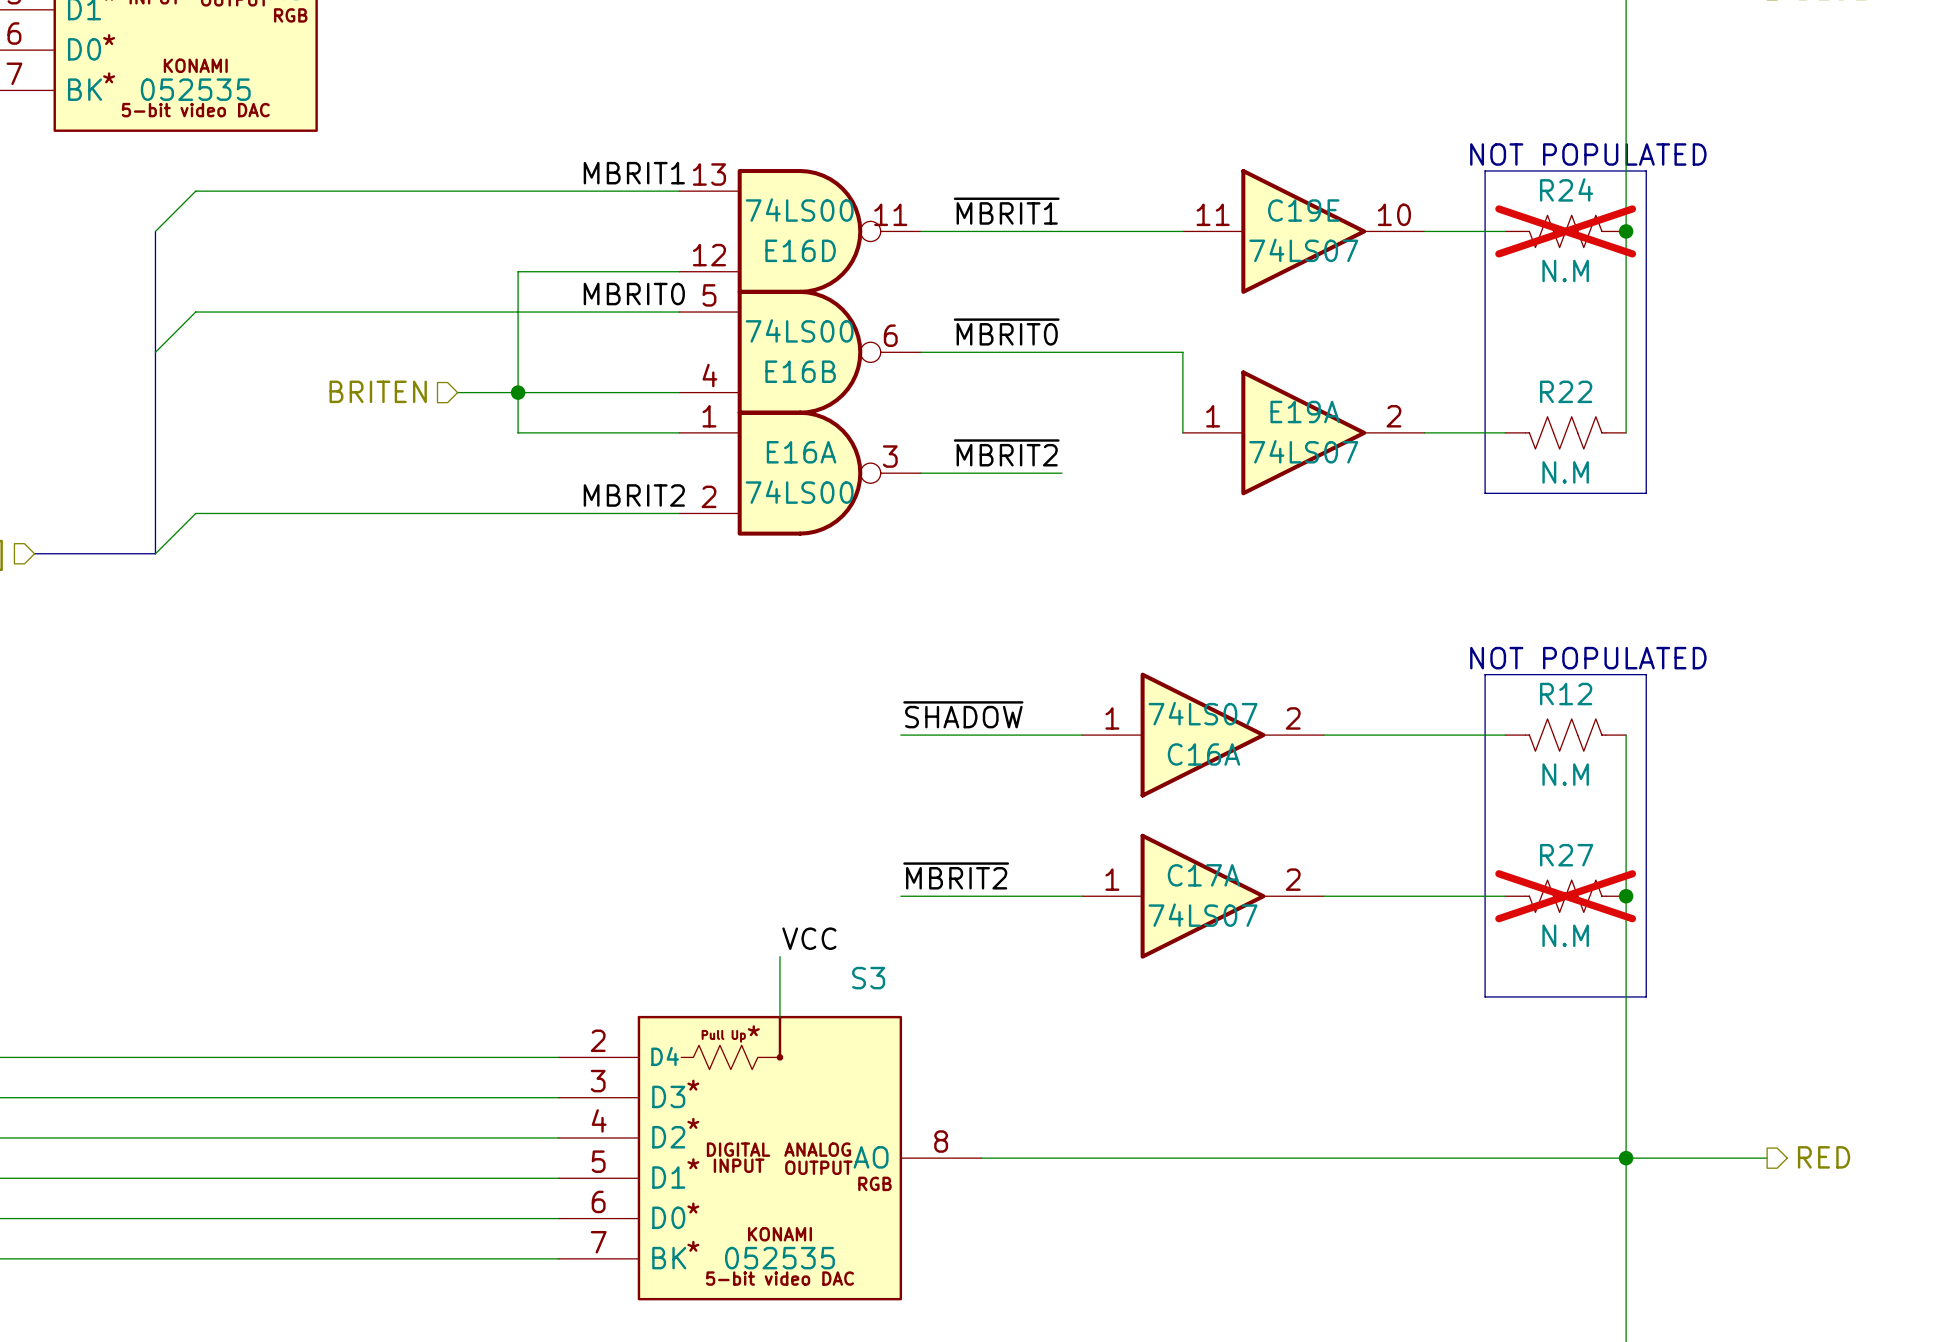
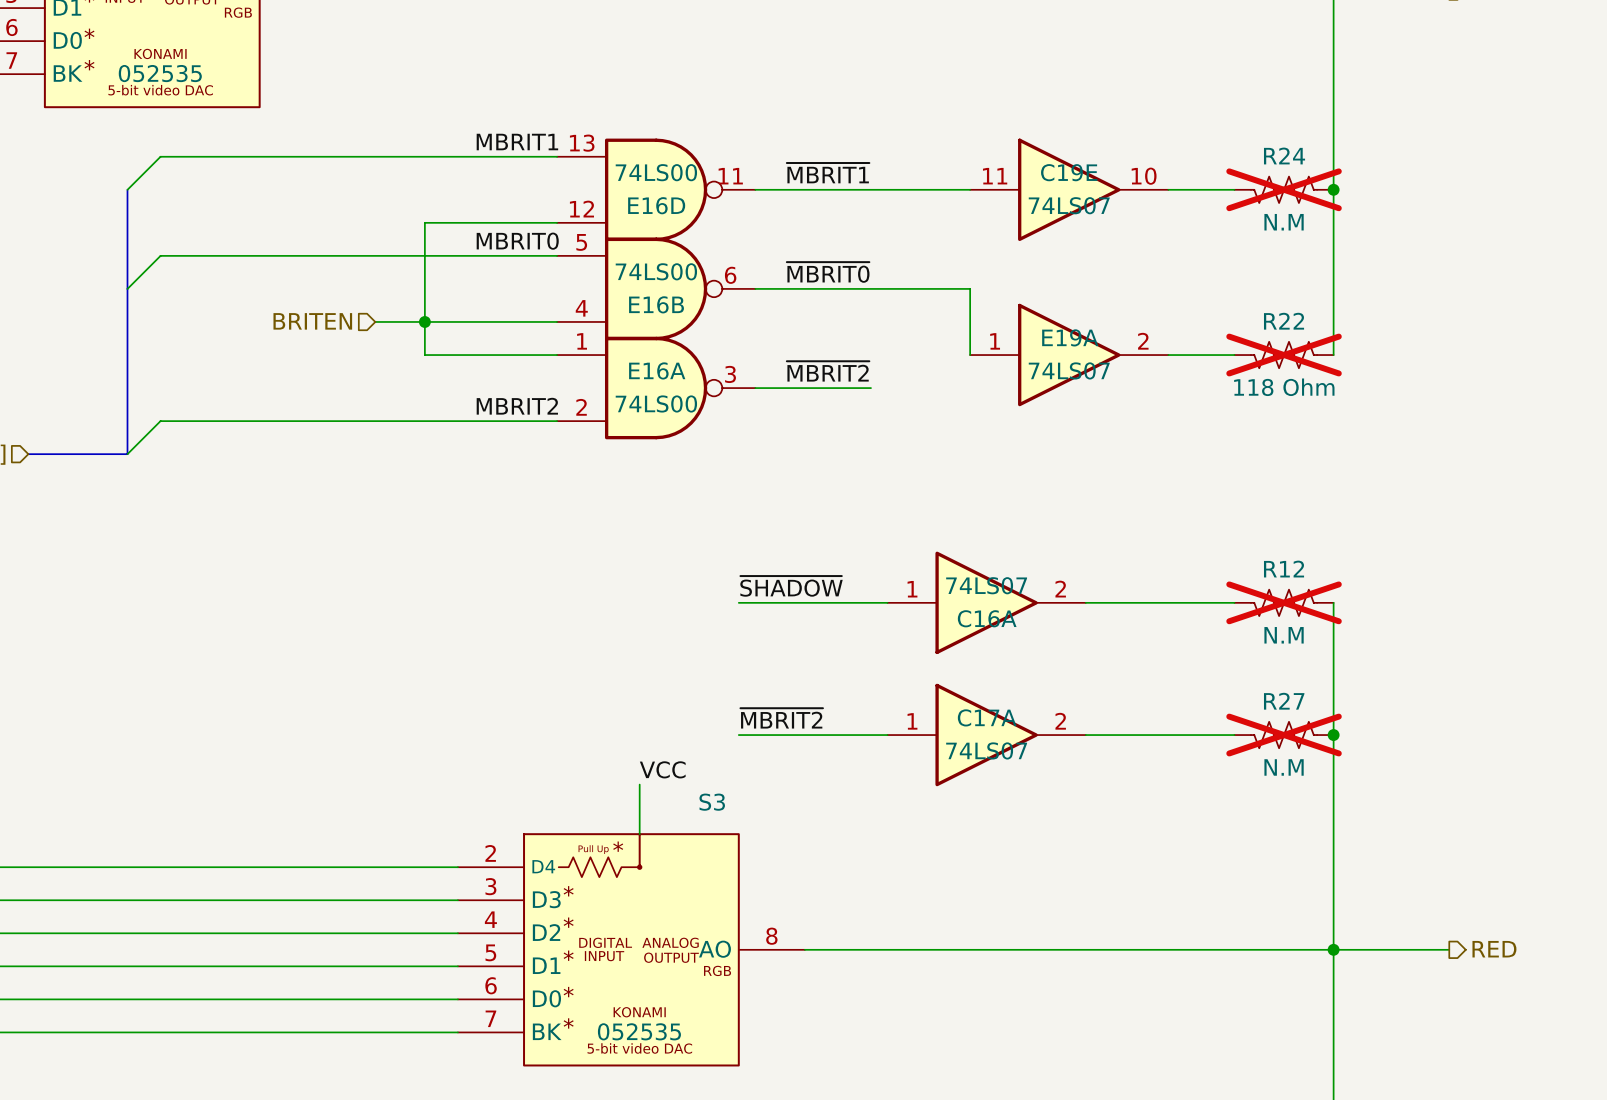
text: NOT POPULATED (1588, 154) -> none
line: (1485, 170) (1646, 170) (1646, 493) (1485, 493) (1485, 170) -> none
R22 do-not-place cross: none -> (1284, 355)
R22 value: N.M (1565, 472) -> 118 Ohm (1284, 387)
text: NOT POPULATED (1588, 658) -> none
line: (1485, 674) (1646, 674) (1646, 996) (1485, 996) (1485, 674) -> none
R12 do-not-place cross: none -> (1284, 602)

